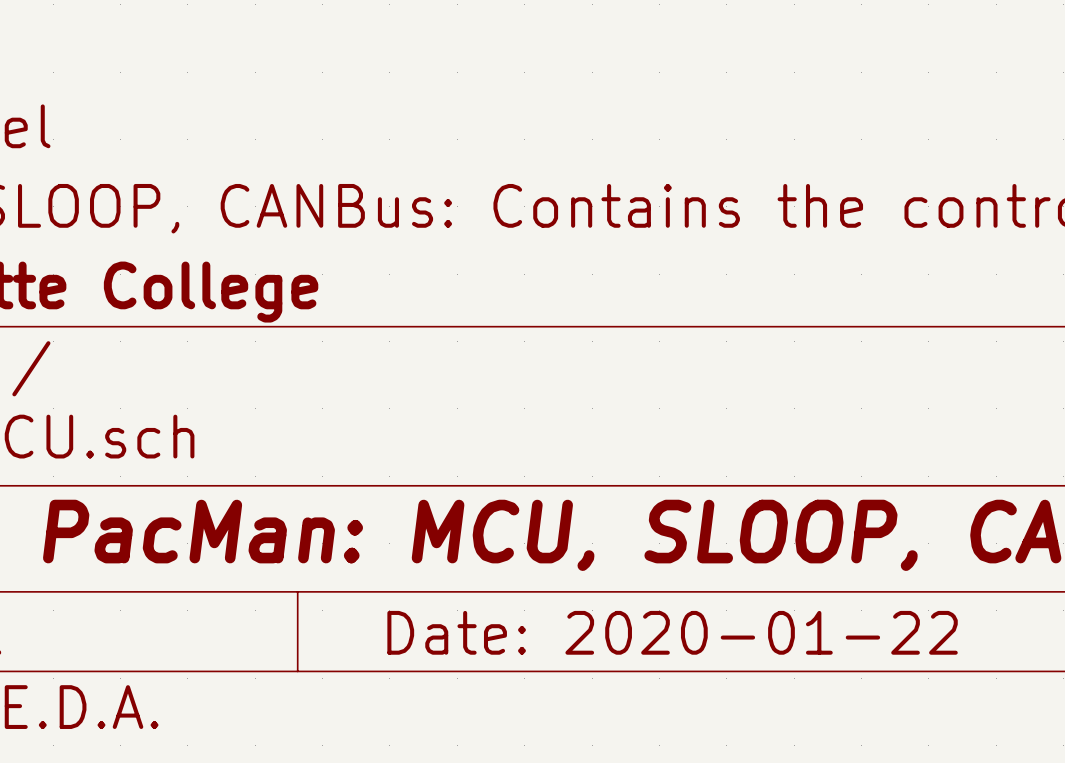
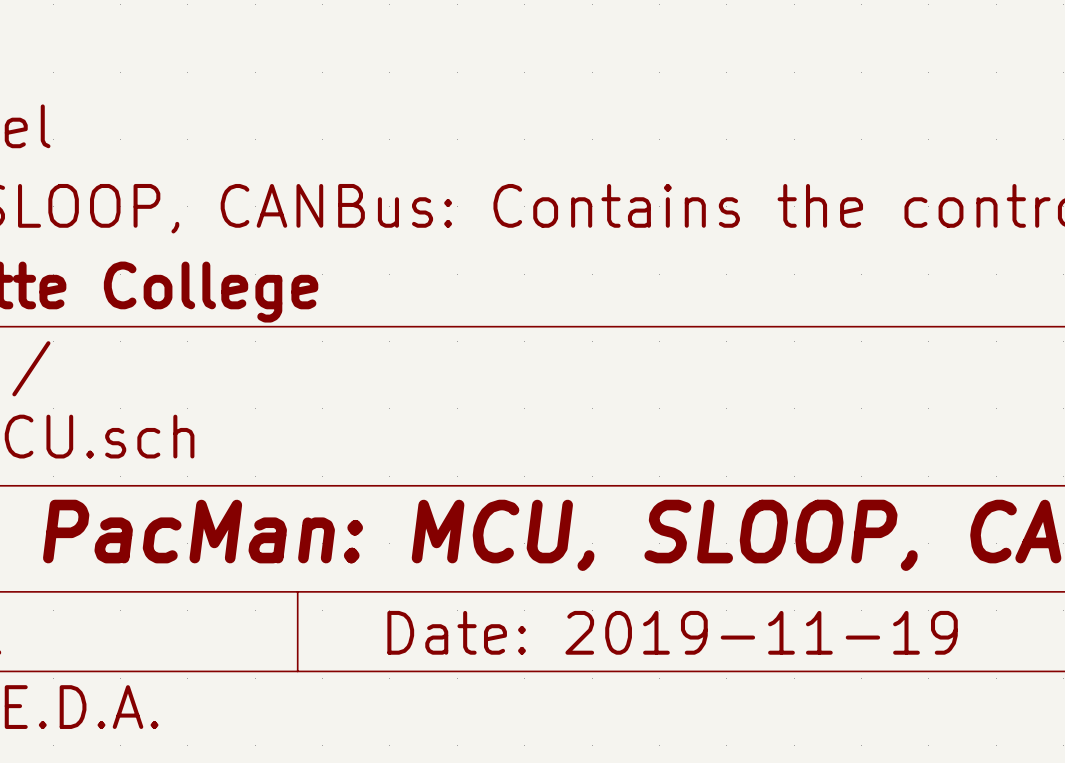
title block: Date: 2020-01-22 (672, 632) -> Date: 2019-11-19 (672, 632)

